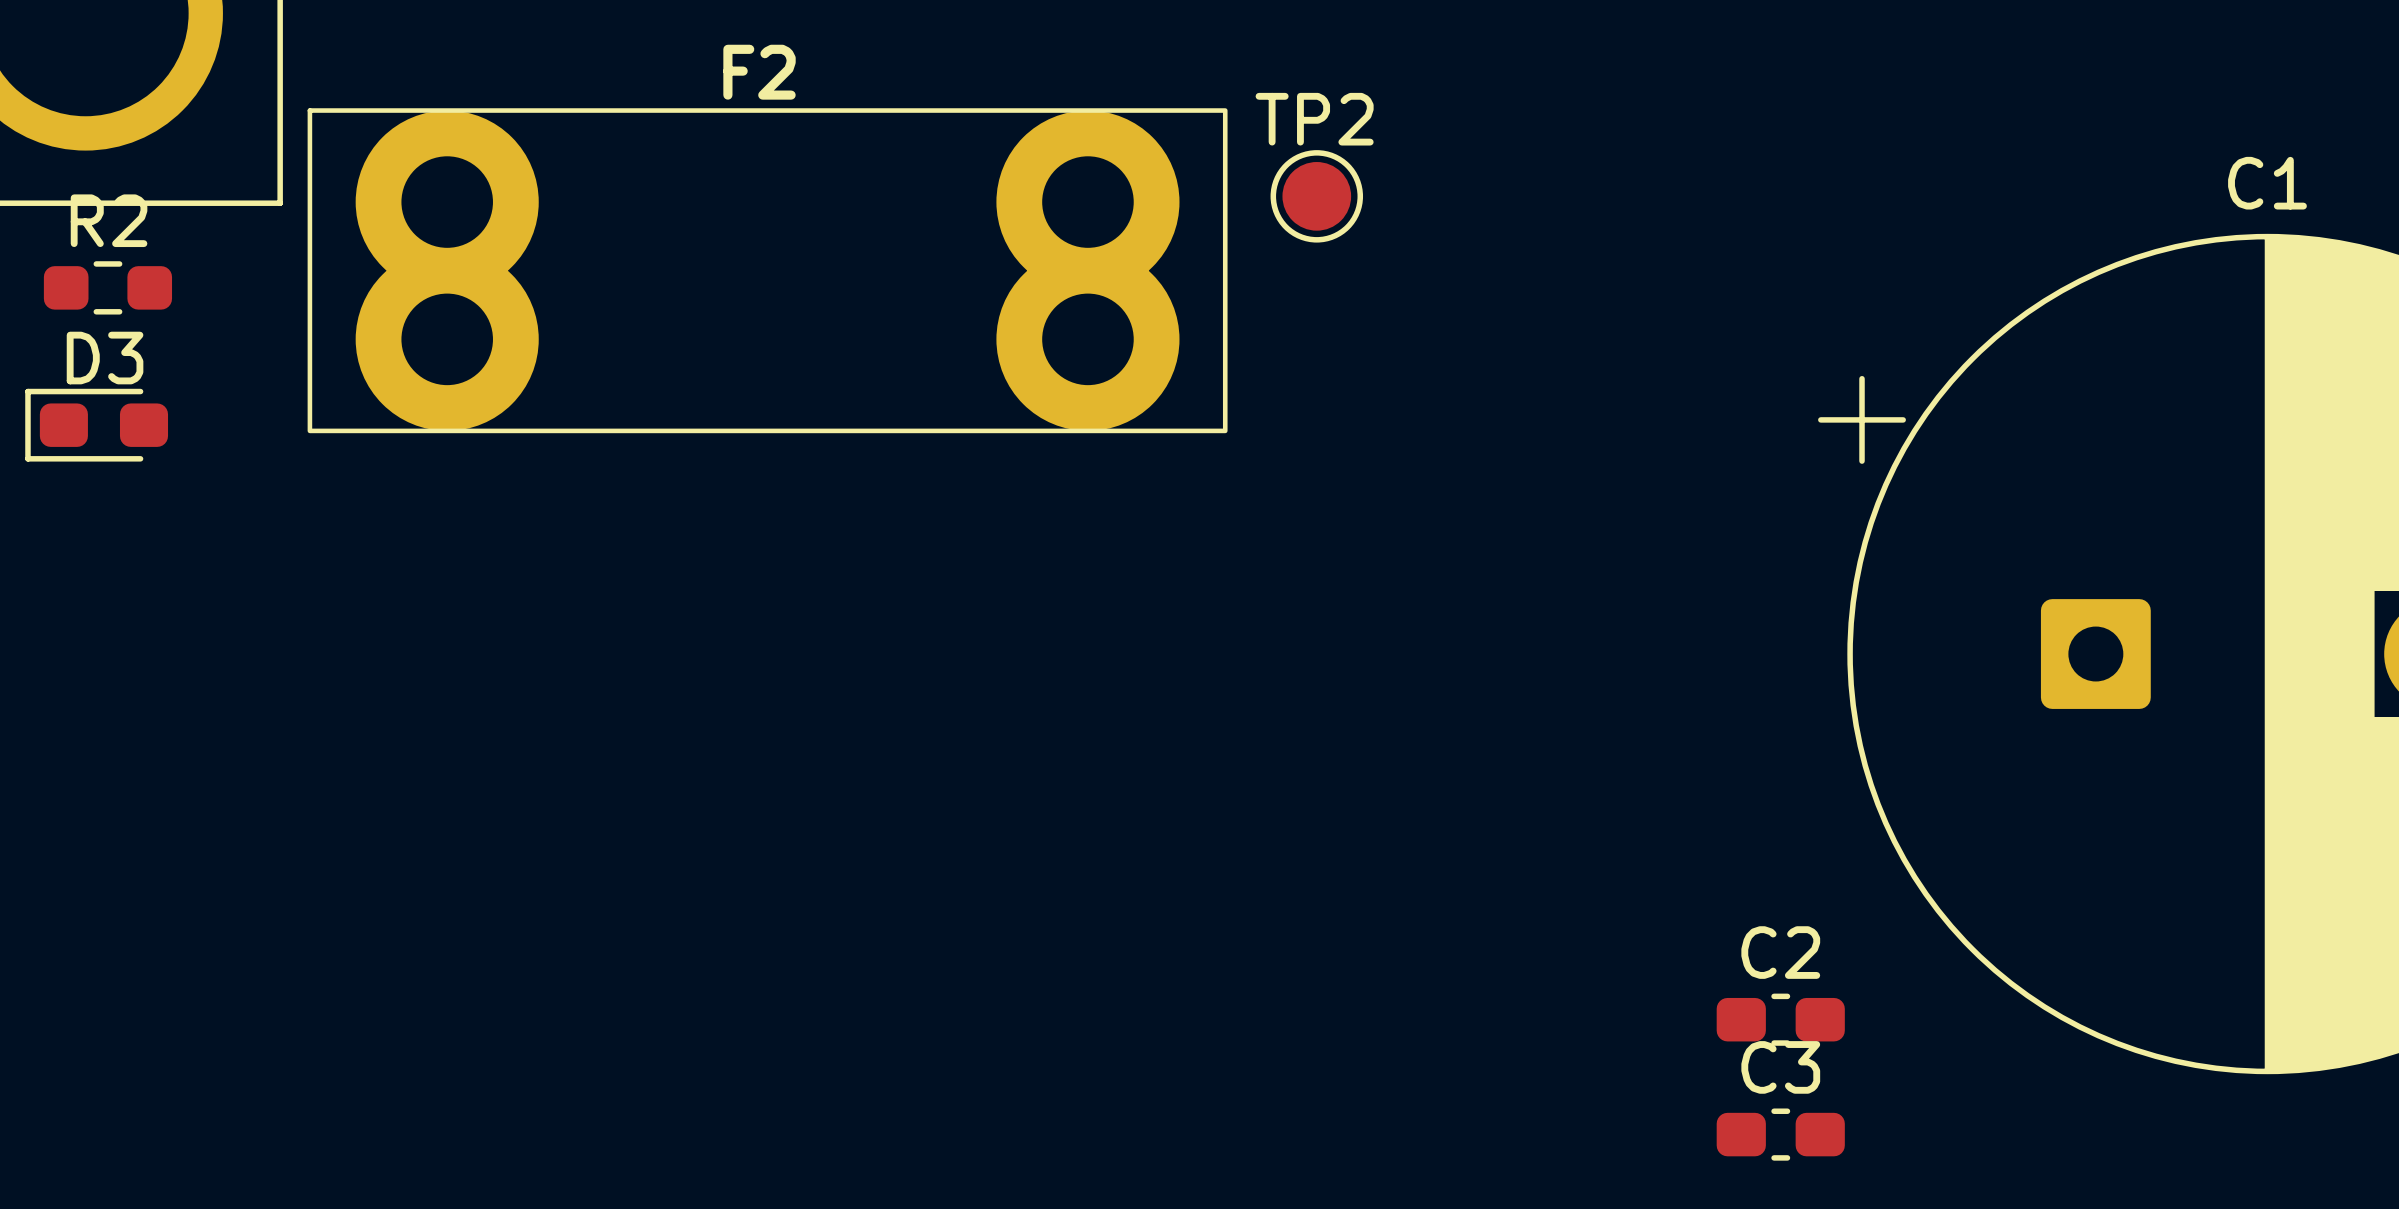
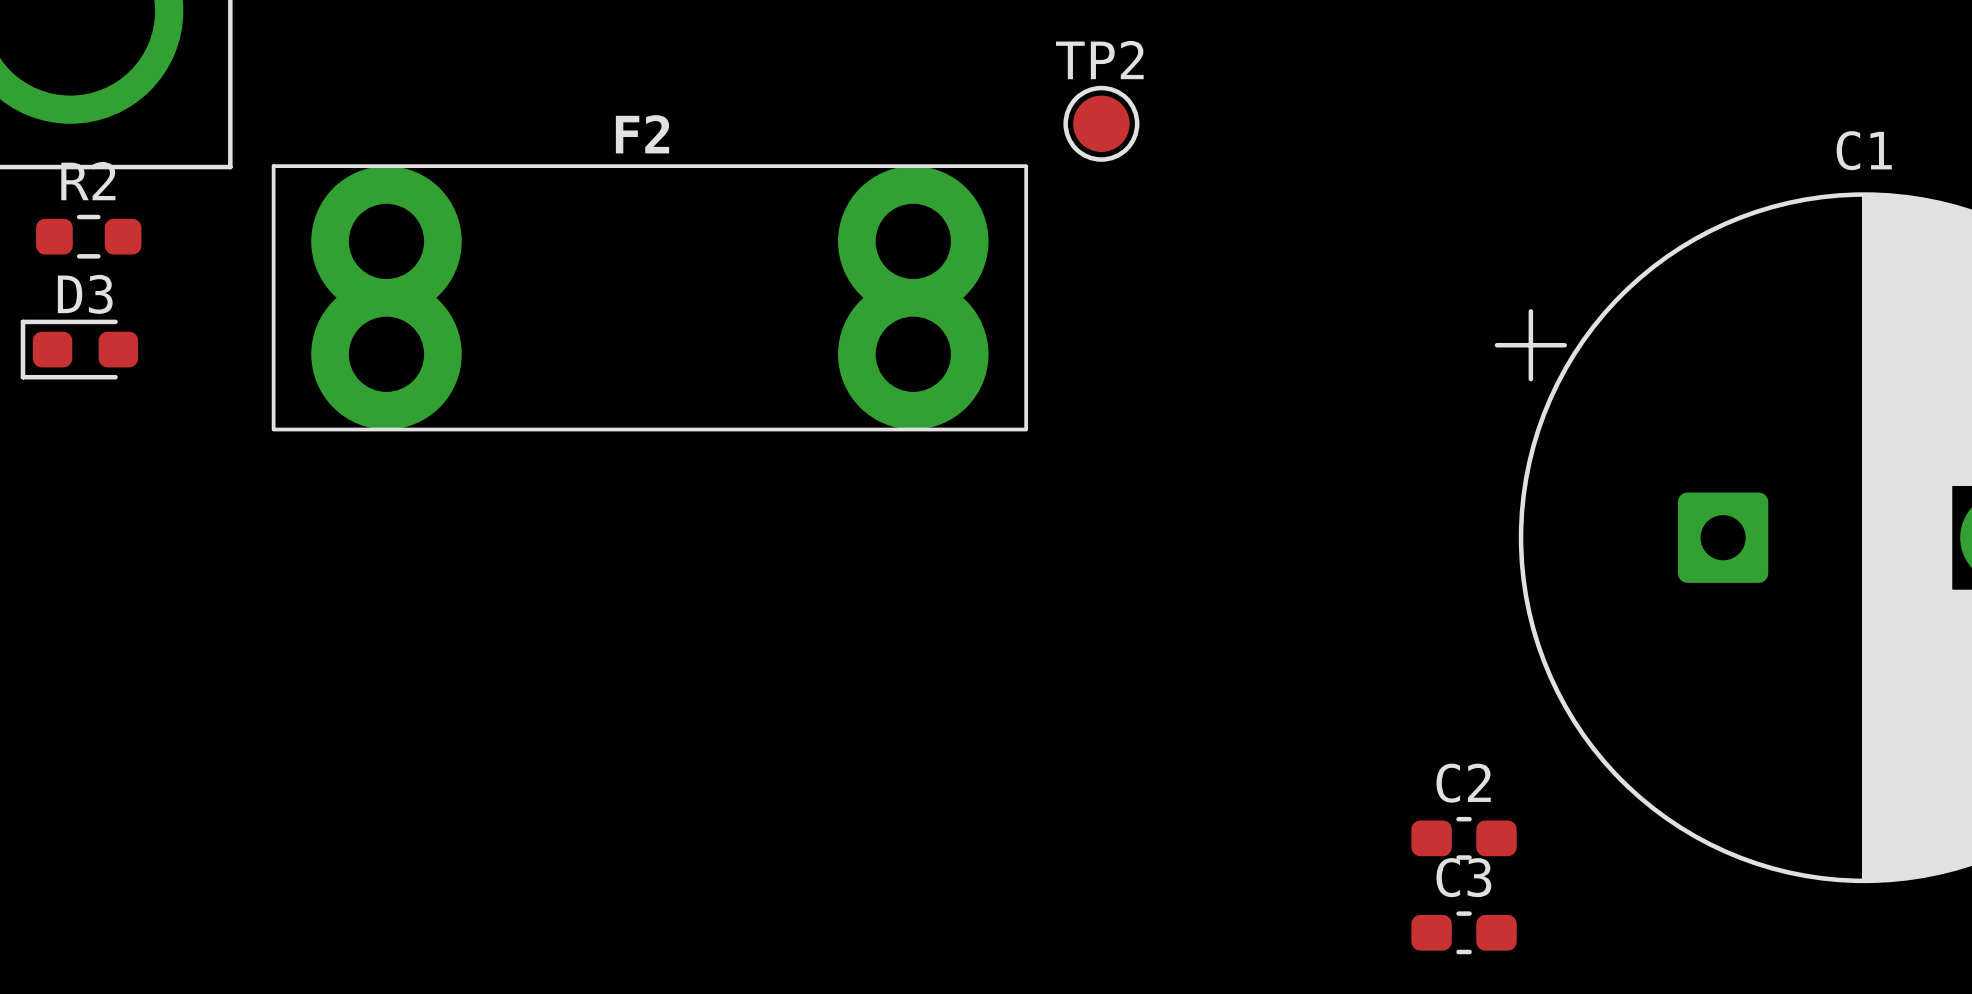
TP2 position: (1316, 196) -> (1101, 123)
F2 position: (767, 270) -> (649, 297)

